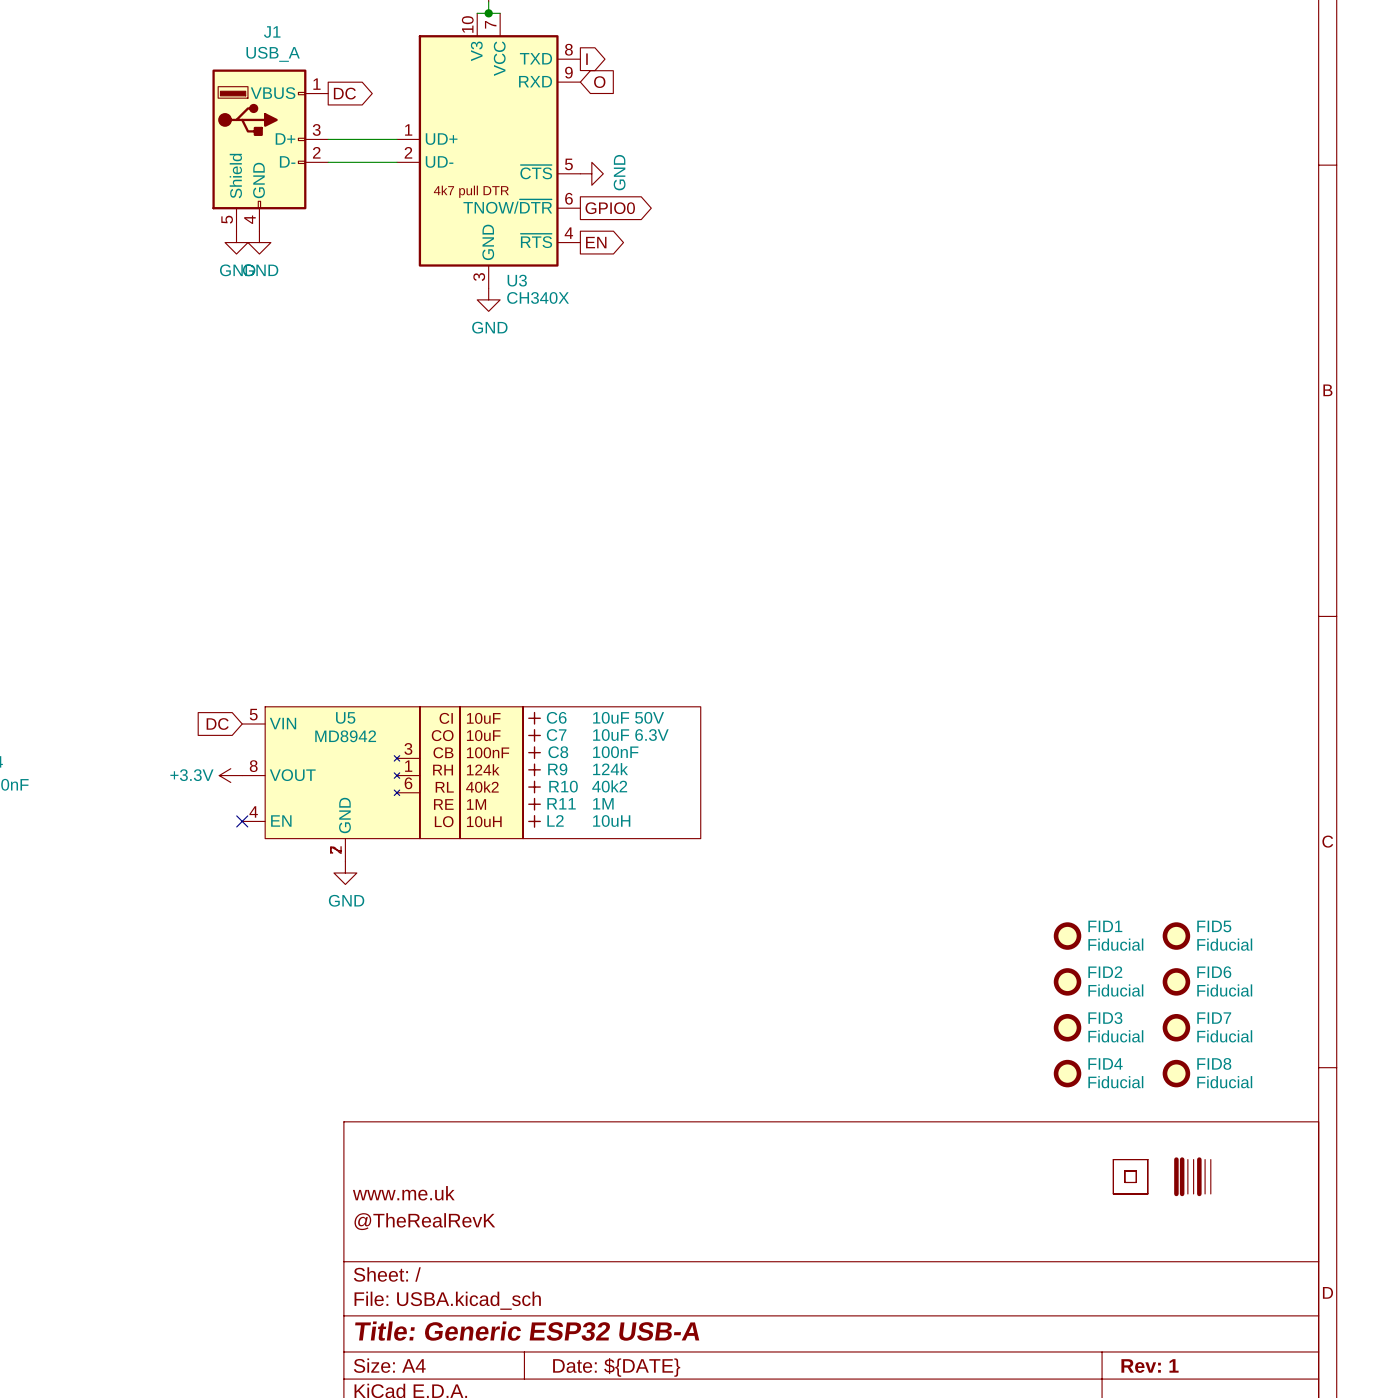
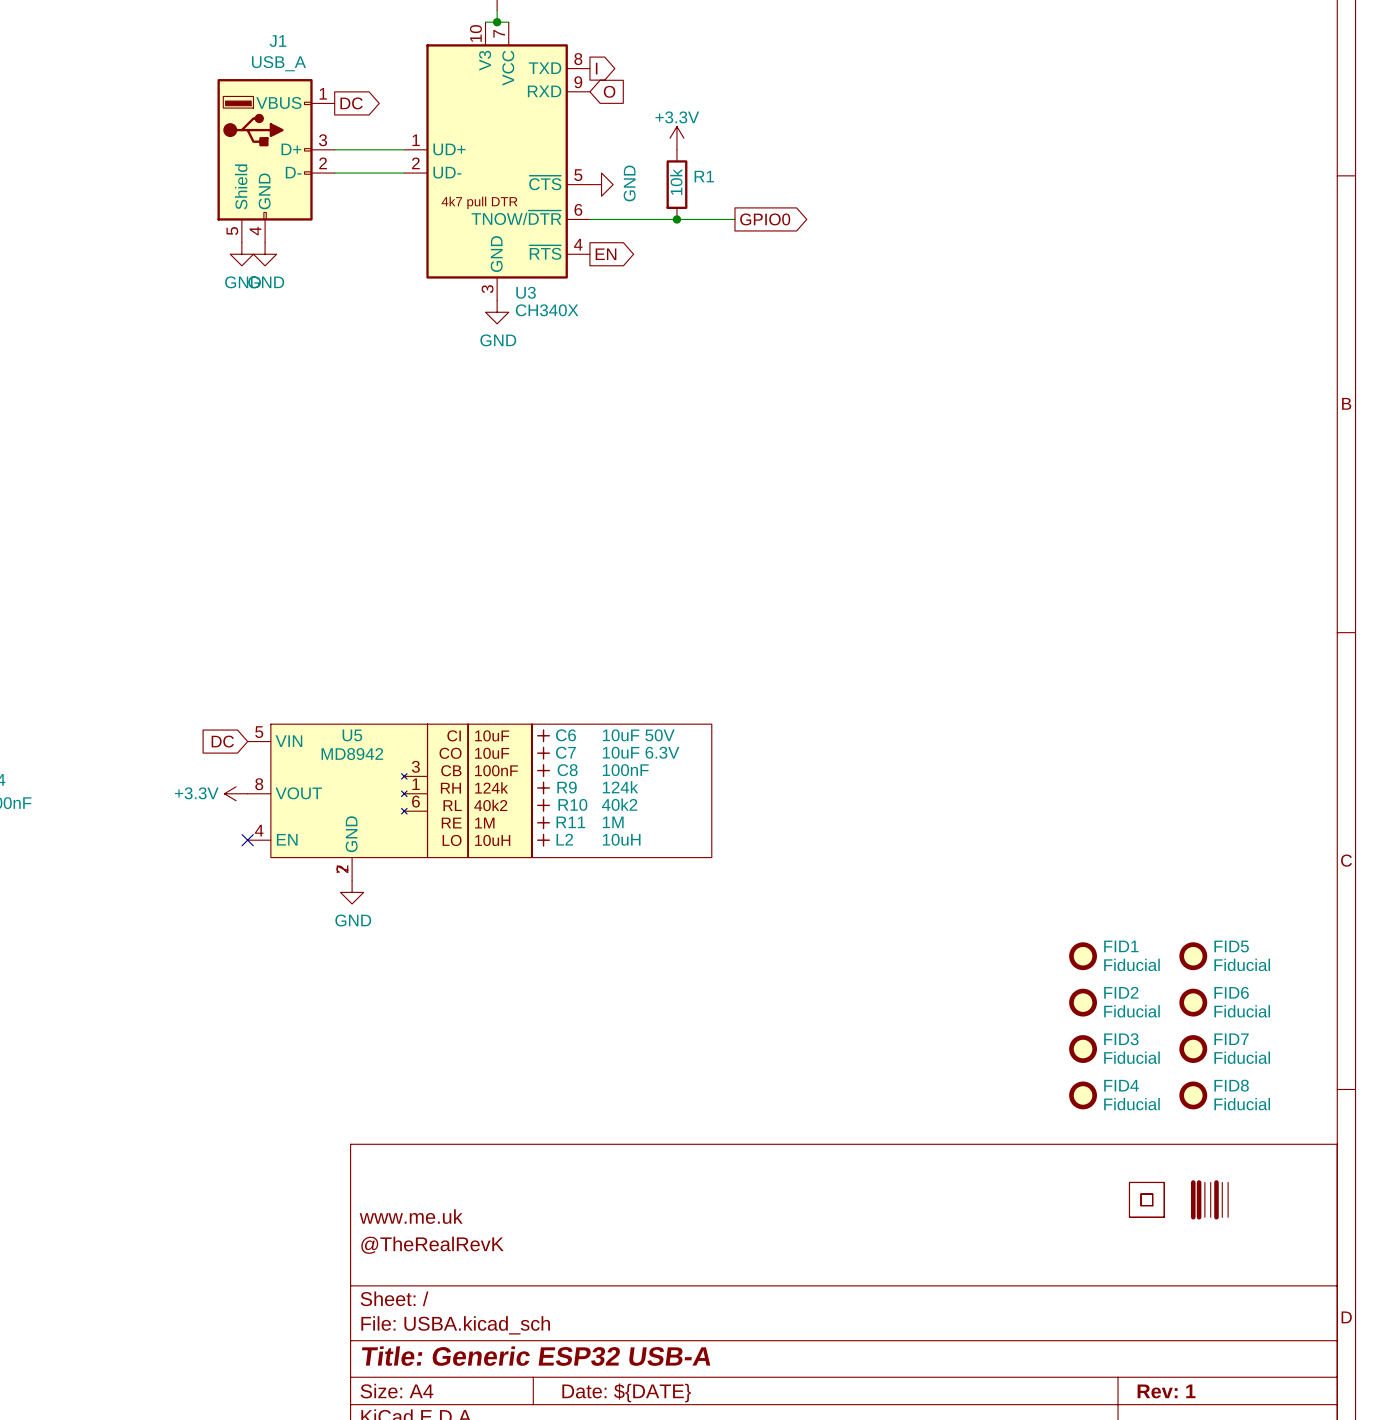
power symbol: none -> +3.3V (676, 138)
R1: none -> 10k (676, 184)
wire: none -> (589, 219) (734, 219)
global label position: GPIO0 (610, 208) -> GPIO0 (765, 219)
junction: none -> (676, 219)

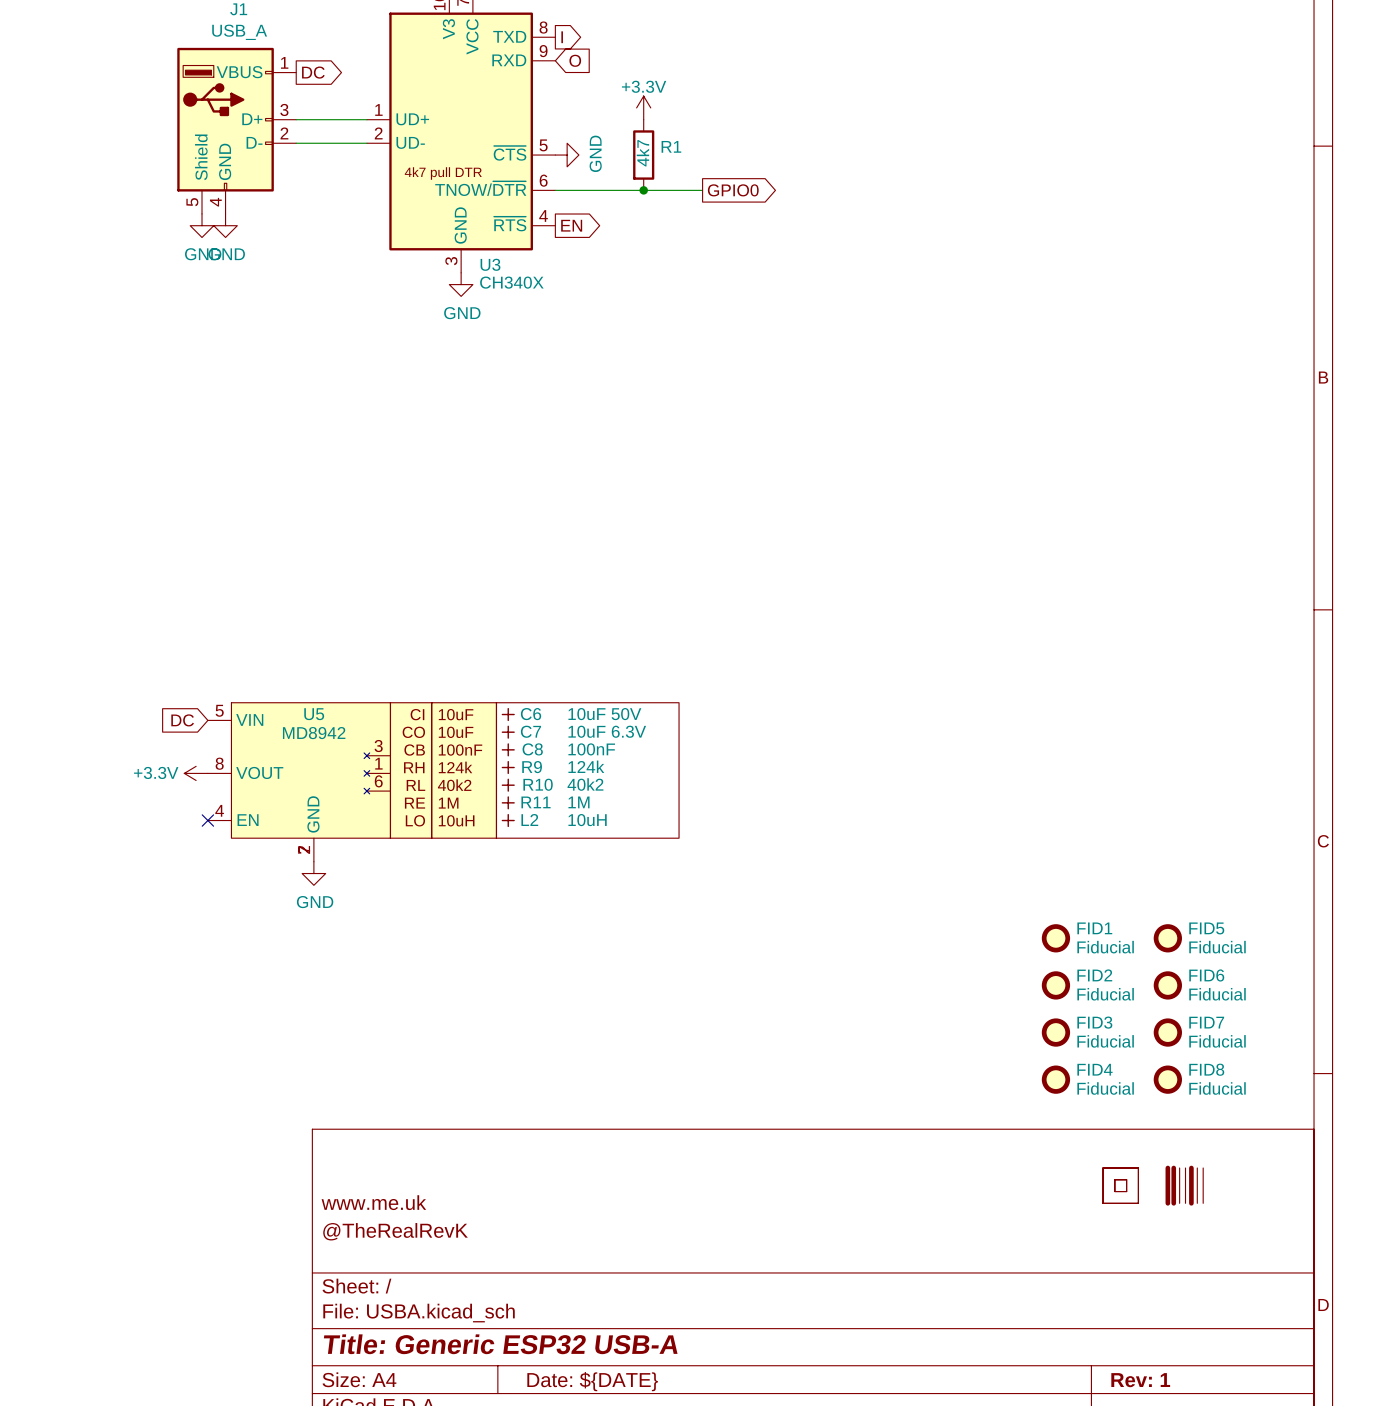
R1 value: 10k (676, 181) -> 4k7 (642, 153)

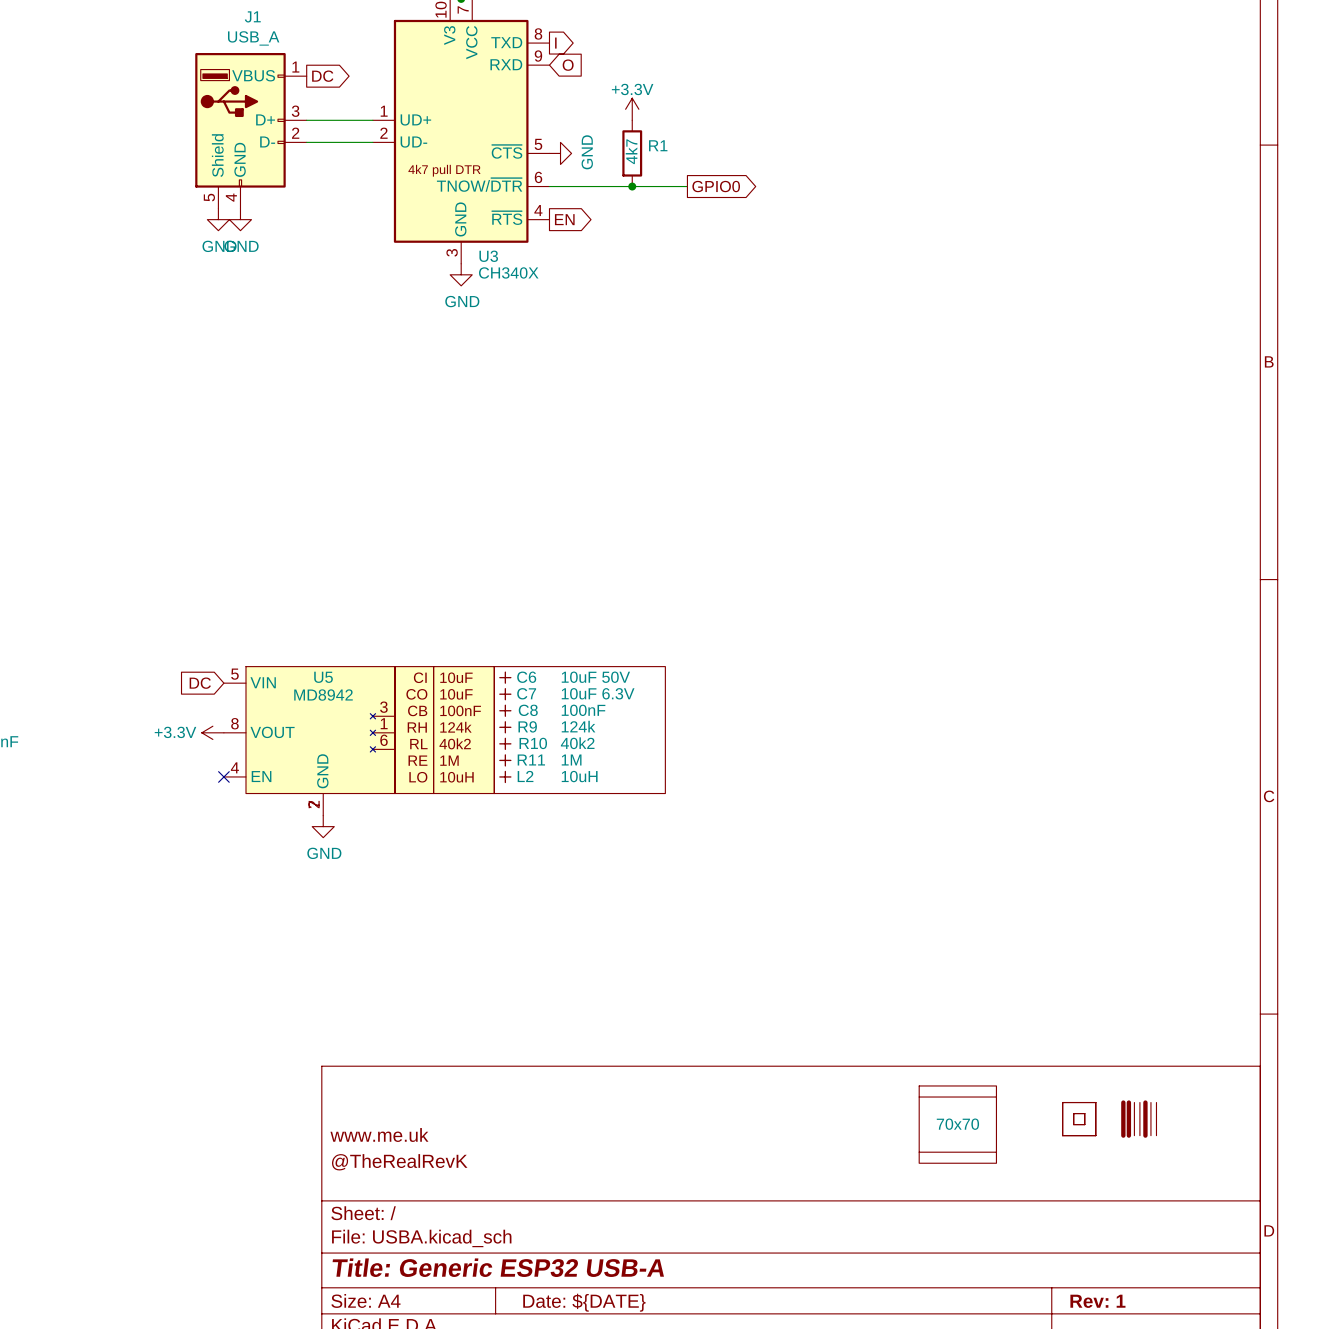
FID1: Fiducial (1055, 938) -> none
FID5: Fiducial (1167, 938) -> none
FID2: Fiducial (1055, 985) -> none
FID6: Fiducial (1167, 985) -> none
FID3: Fiducial (1055, 1032) -> none
FID7: Fiducial (1167, 1032) -> none
FID4: Fiducial (1055, 1079) -> none
FID8: Fiducial (1167, 1079) -> none
part: none -> 70x70 (957, 1124)

